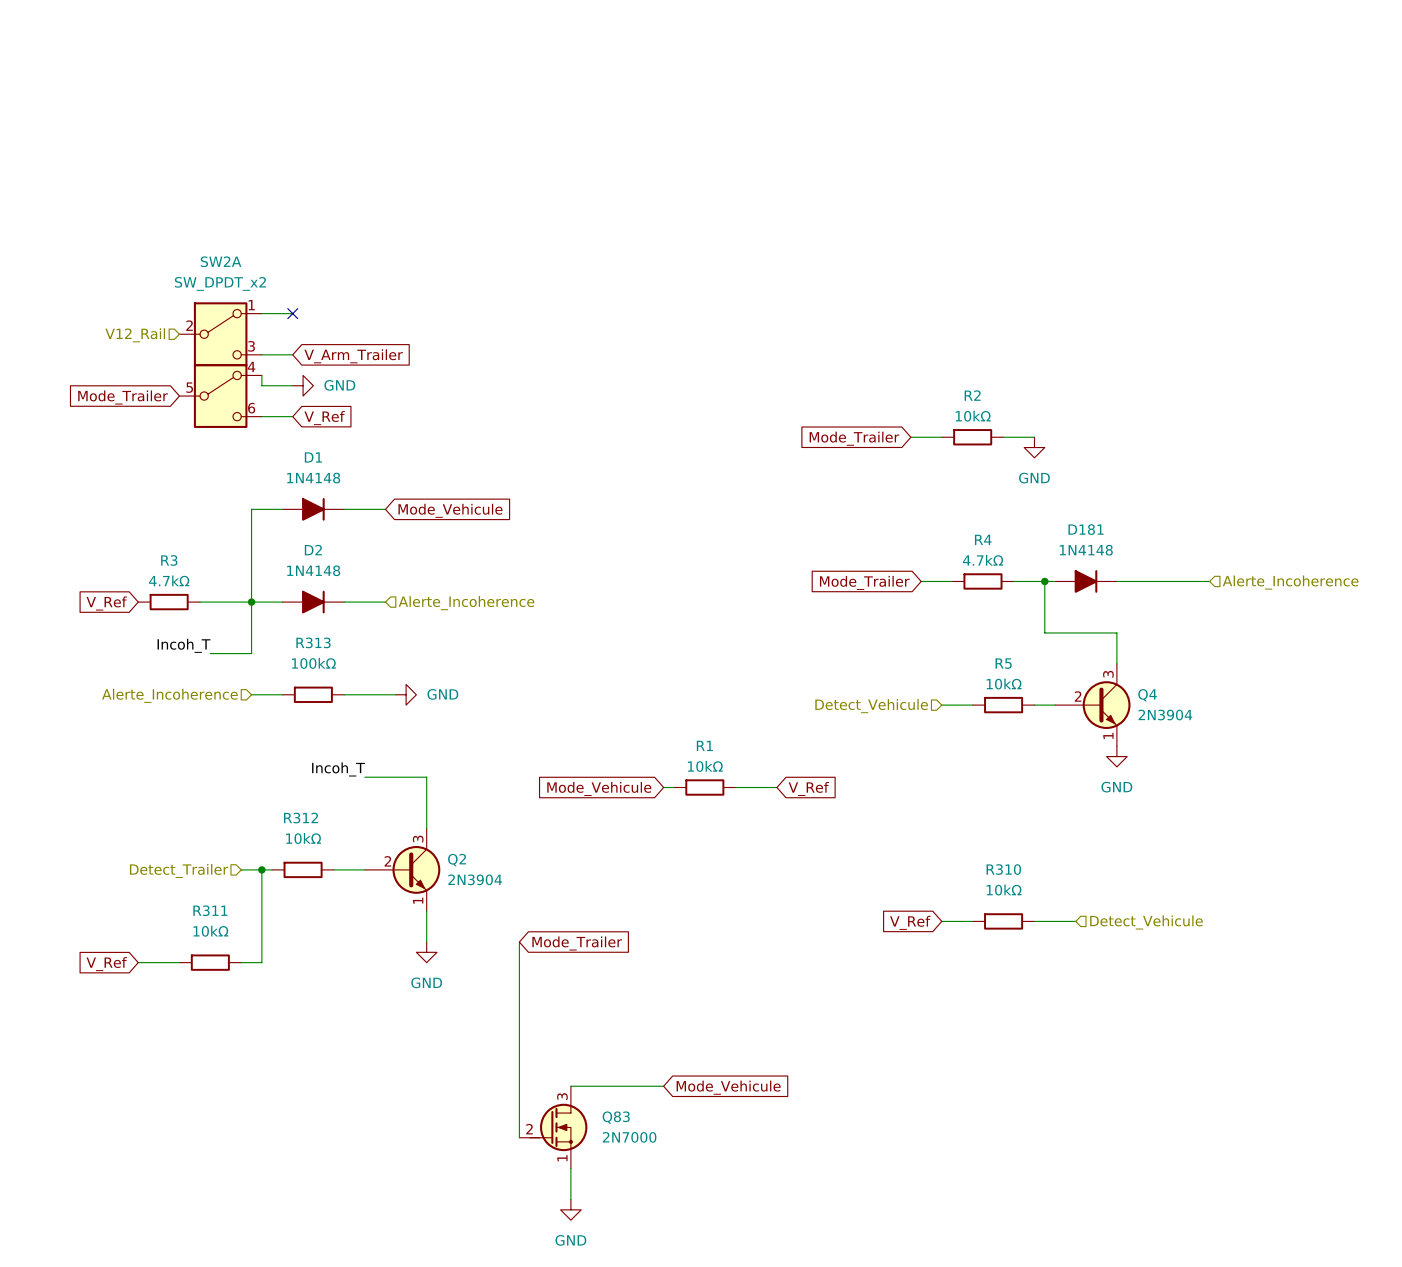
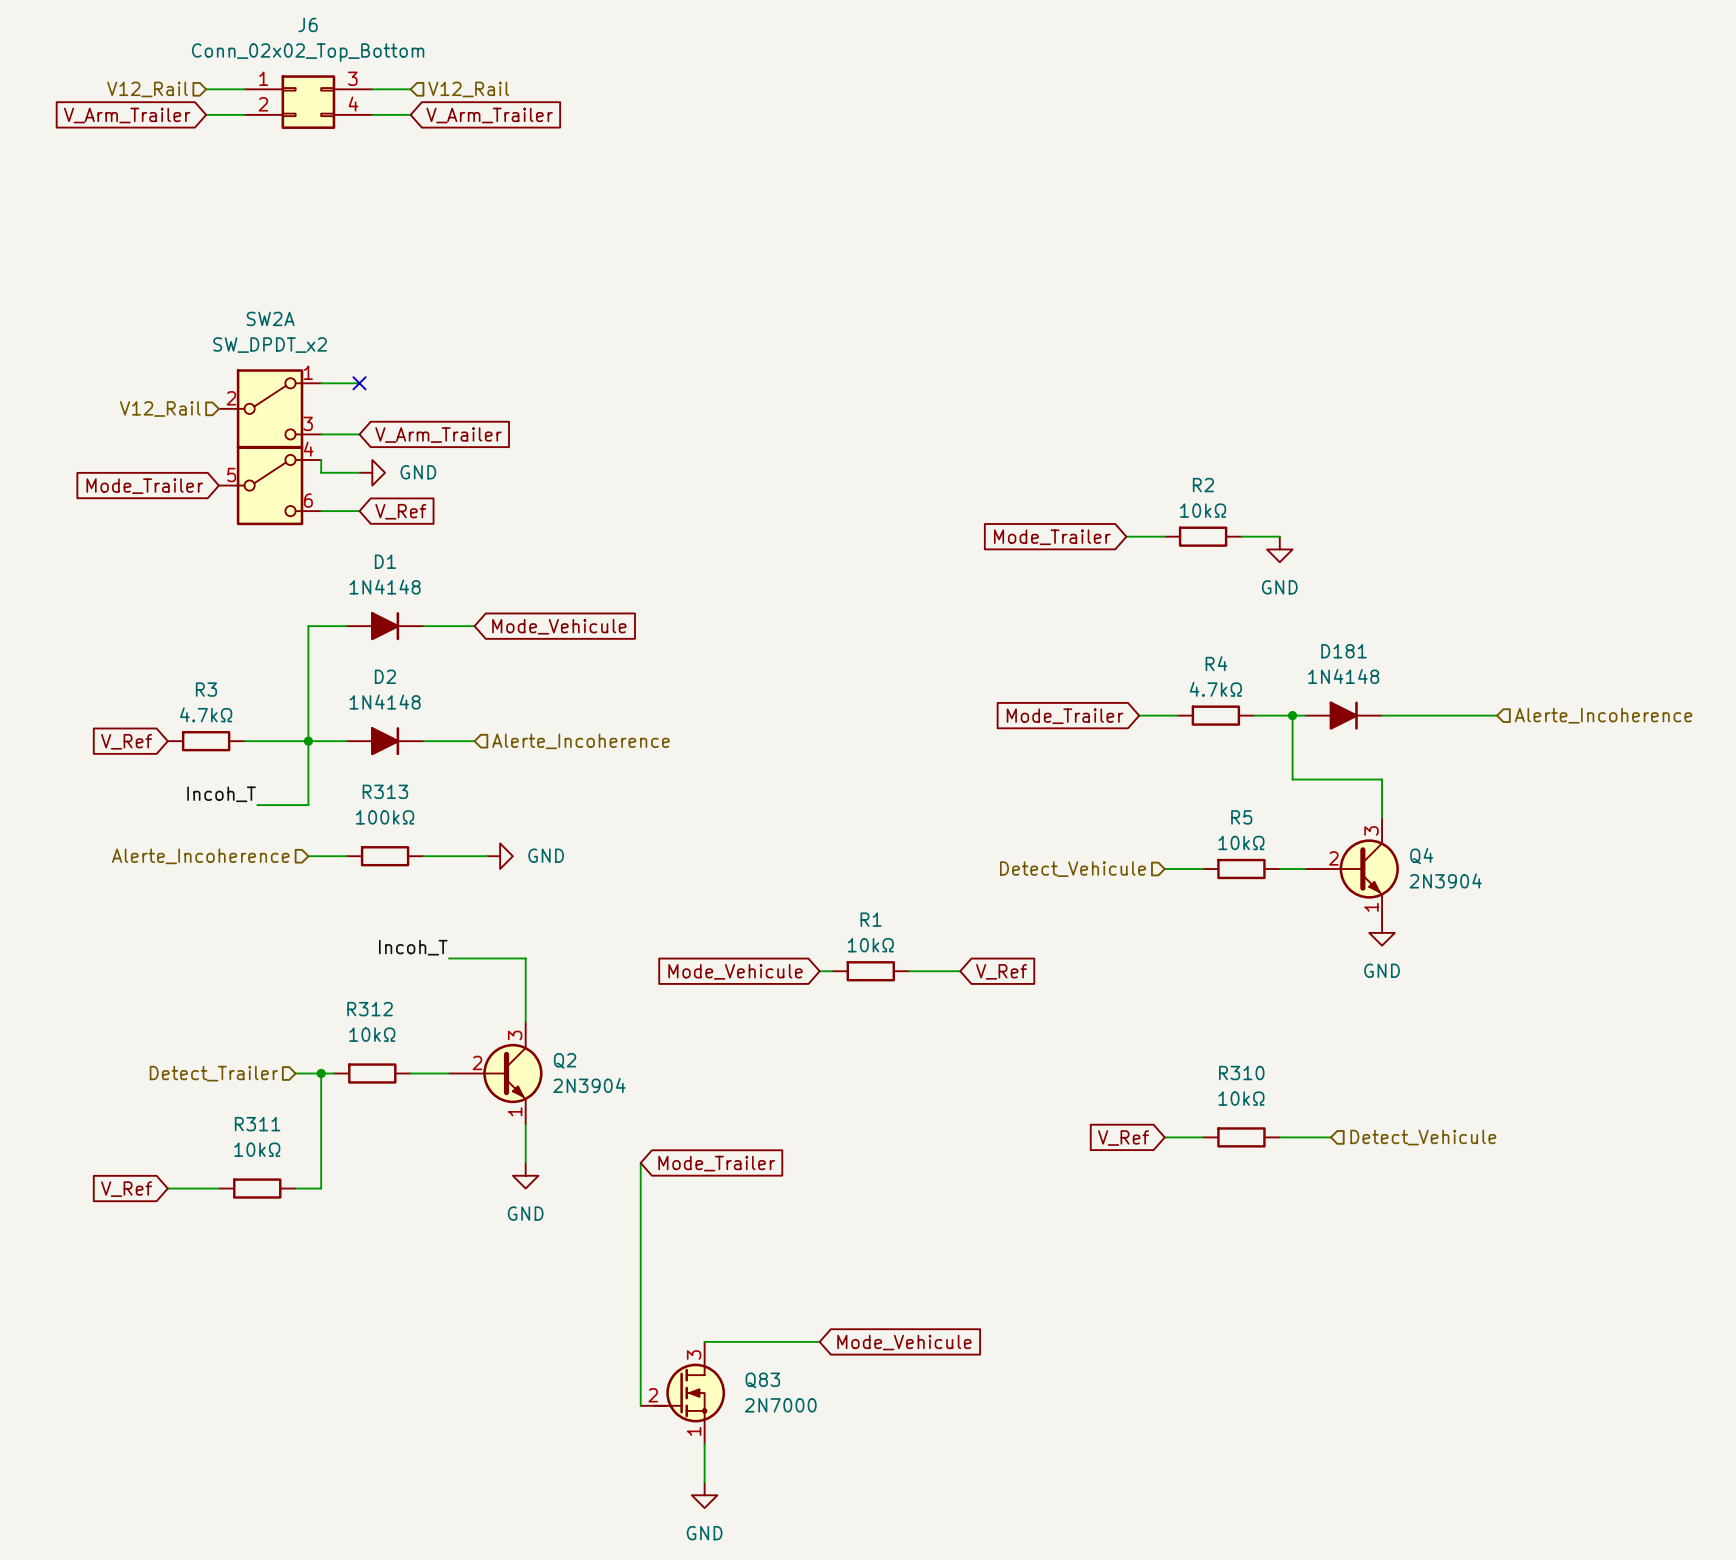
wire: none -> (206, 89) (244, 89)
wire: none -> (372, 89) (410, 89)
hierarchical label: none -> V12_Rail (147, 89)
hierarchical label: none -> V12_Rail (468, 89)
J6: none -> Conn_02x02_Top_Bottom (308, 102)
wire: none -> (206, 114) (244, 114)
wire: none -> (372, 114) (410, 114)
global label: none -> V_Arm_Trailer (127, 115)
global label: none -> V_Arm_Trailer (489, 115)

